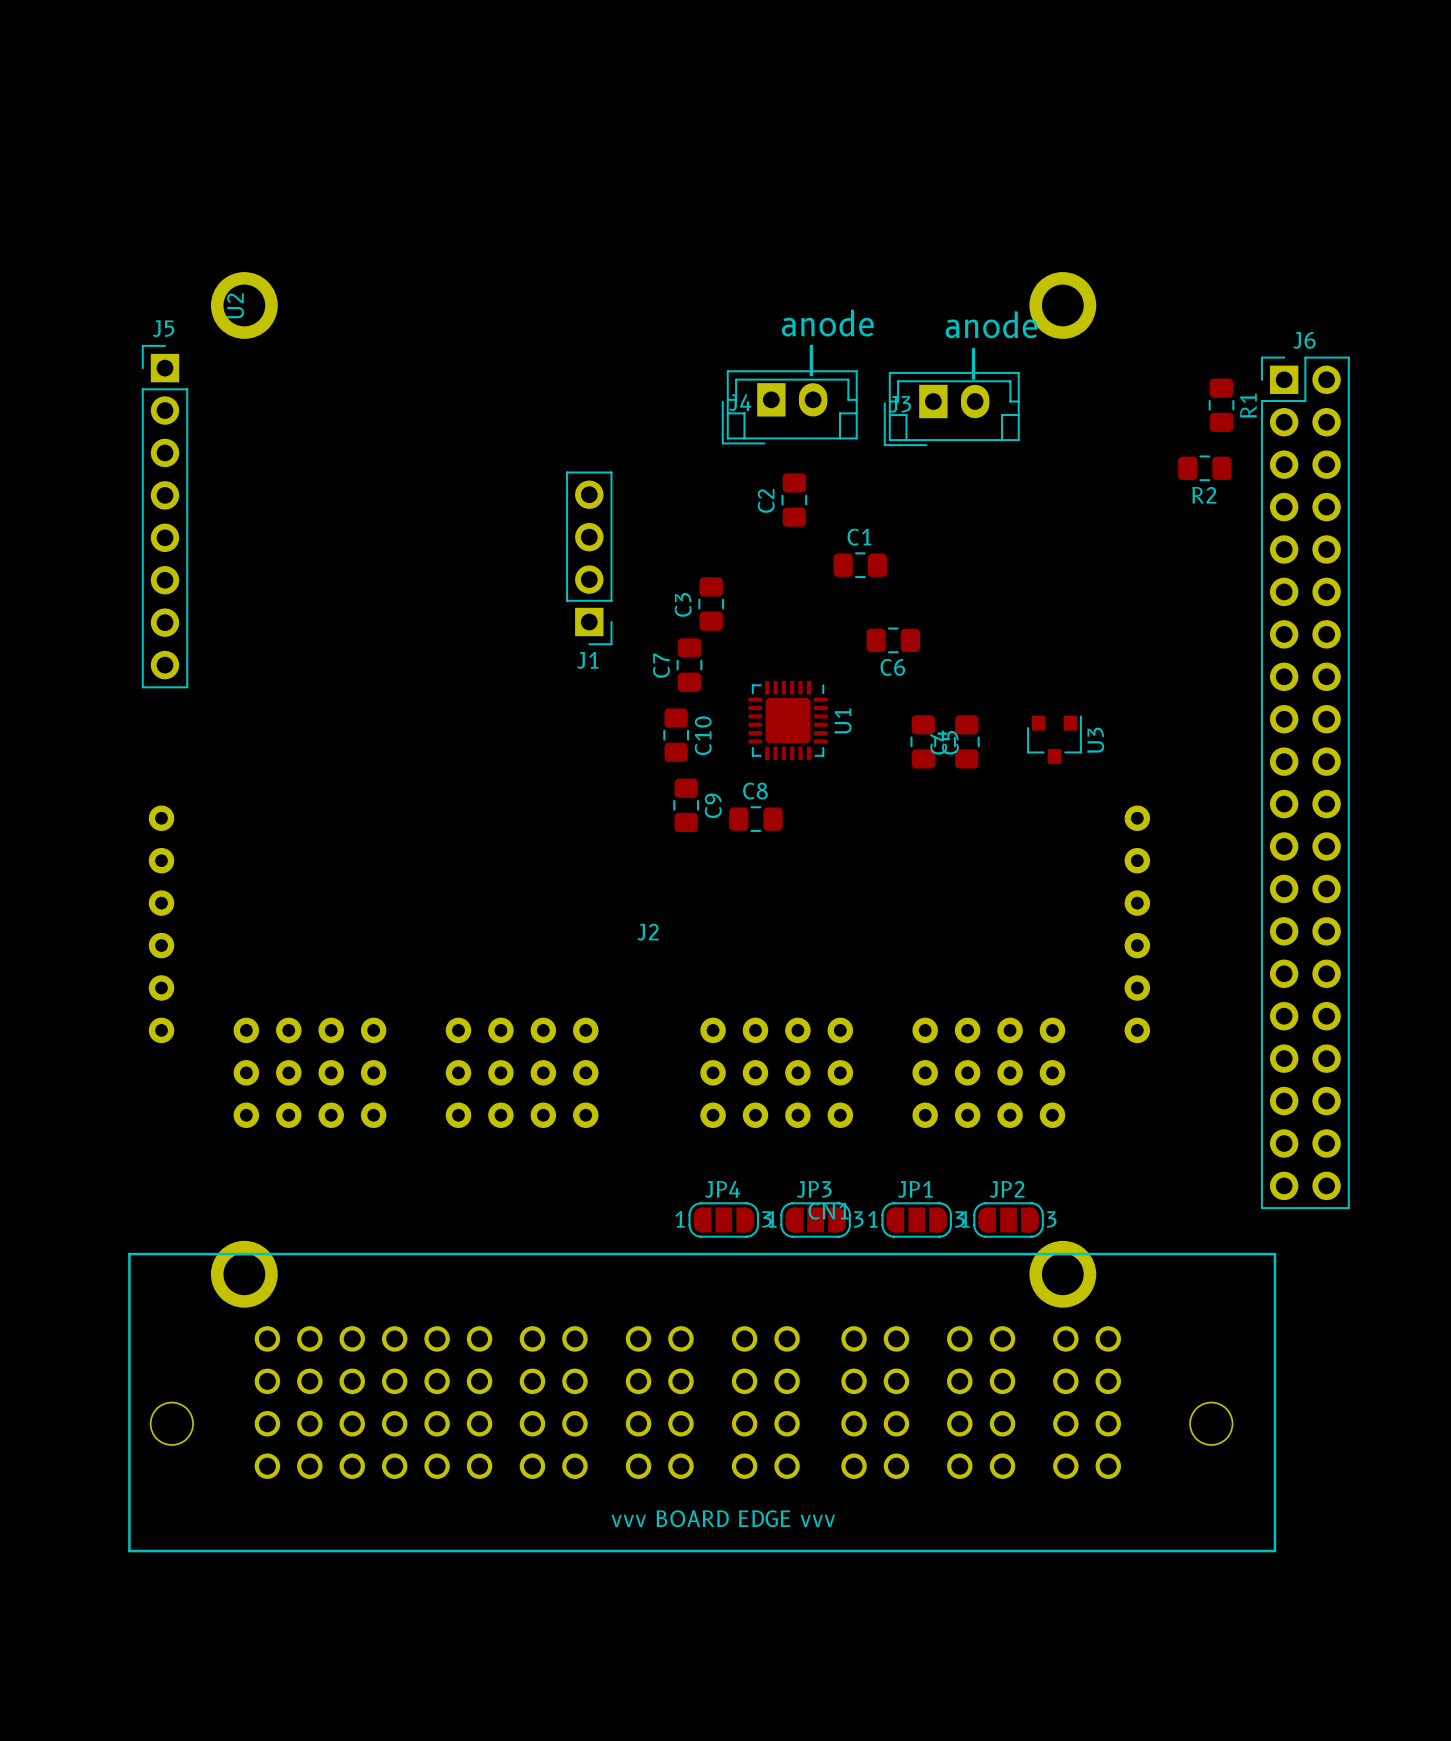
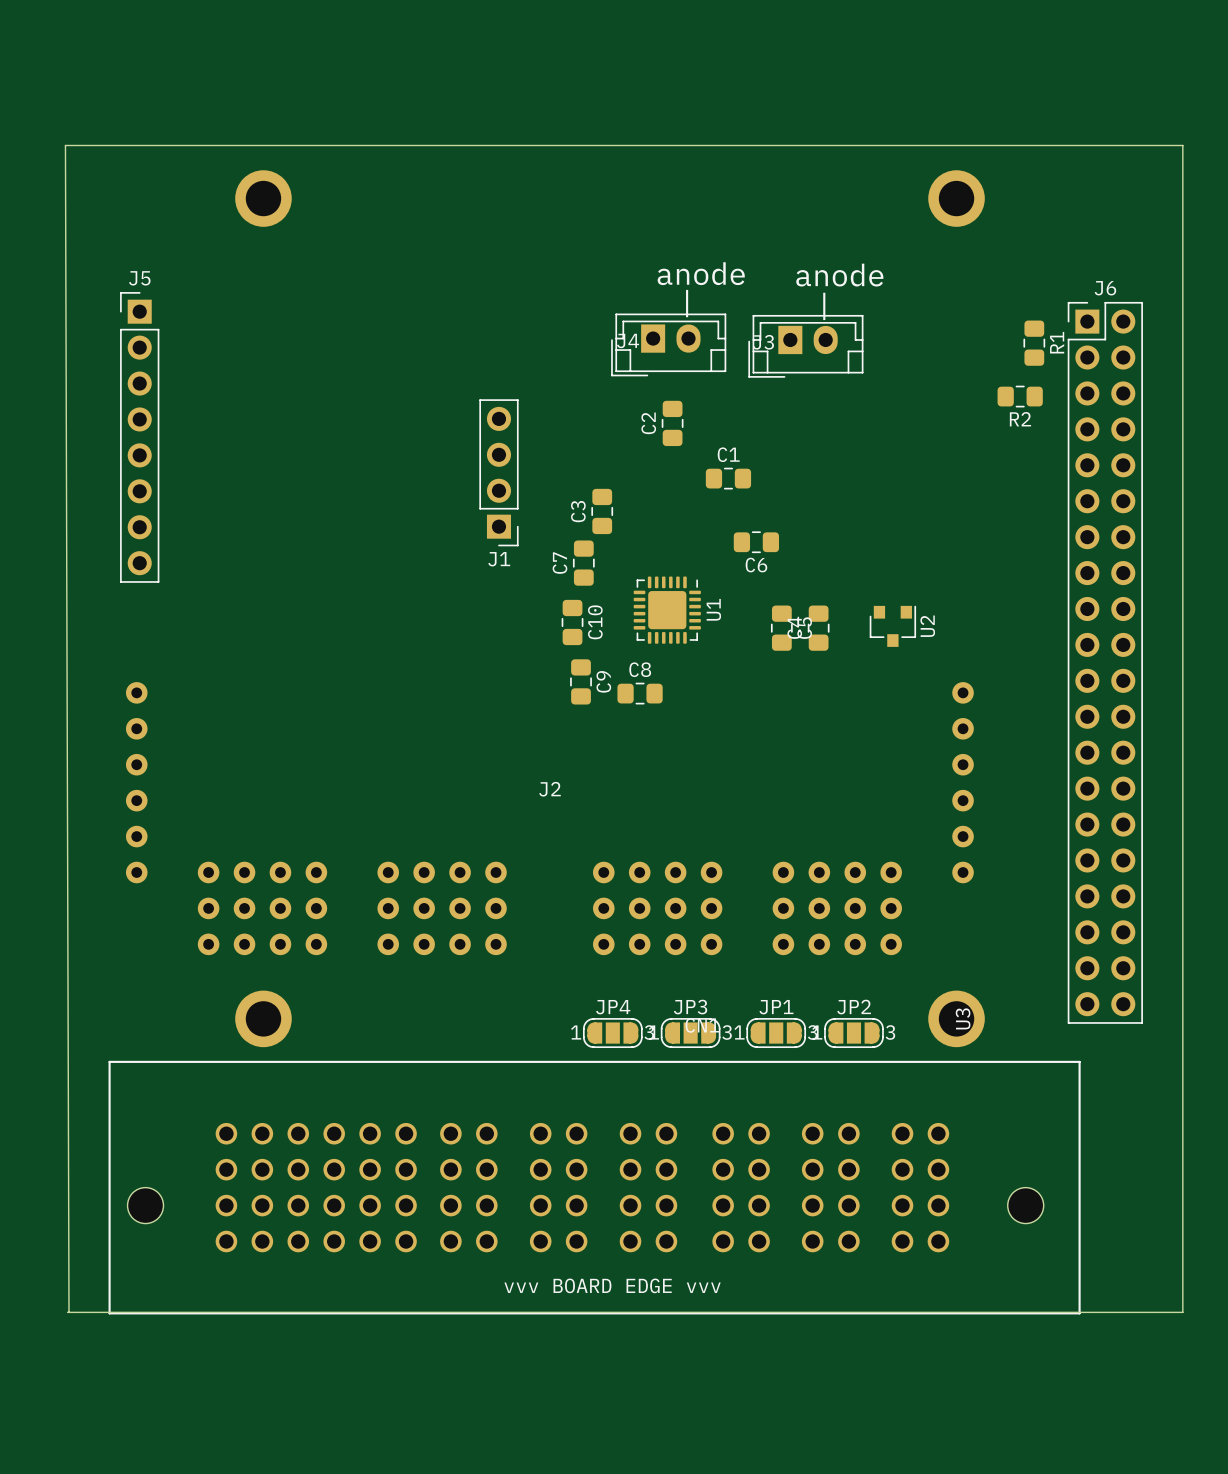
U3: none -> (610, 608)
U3 name: U3 (1095, 740) -> U2 (927, 626)
U2: (653, 789) -> none
board edge: none -> (67, 1312) (1182, 1312) (1182, 145) (65, 145) (69, 1312)

